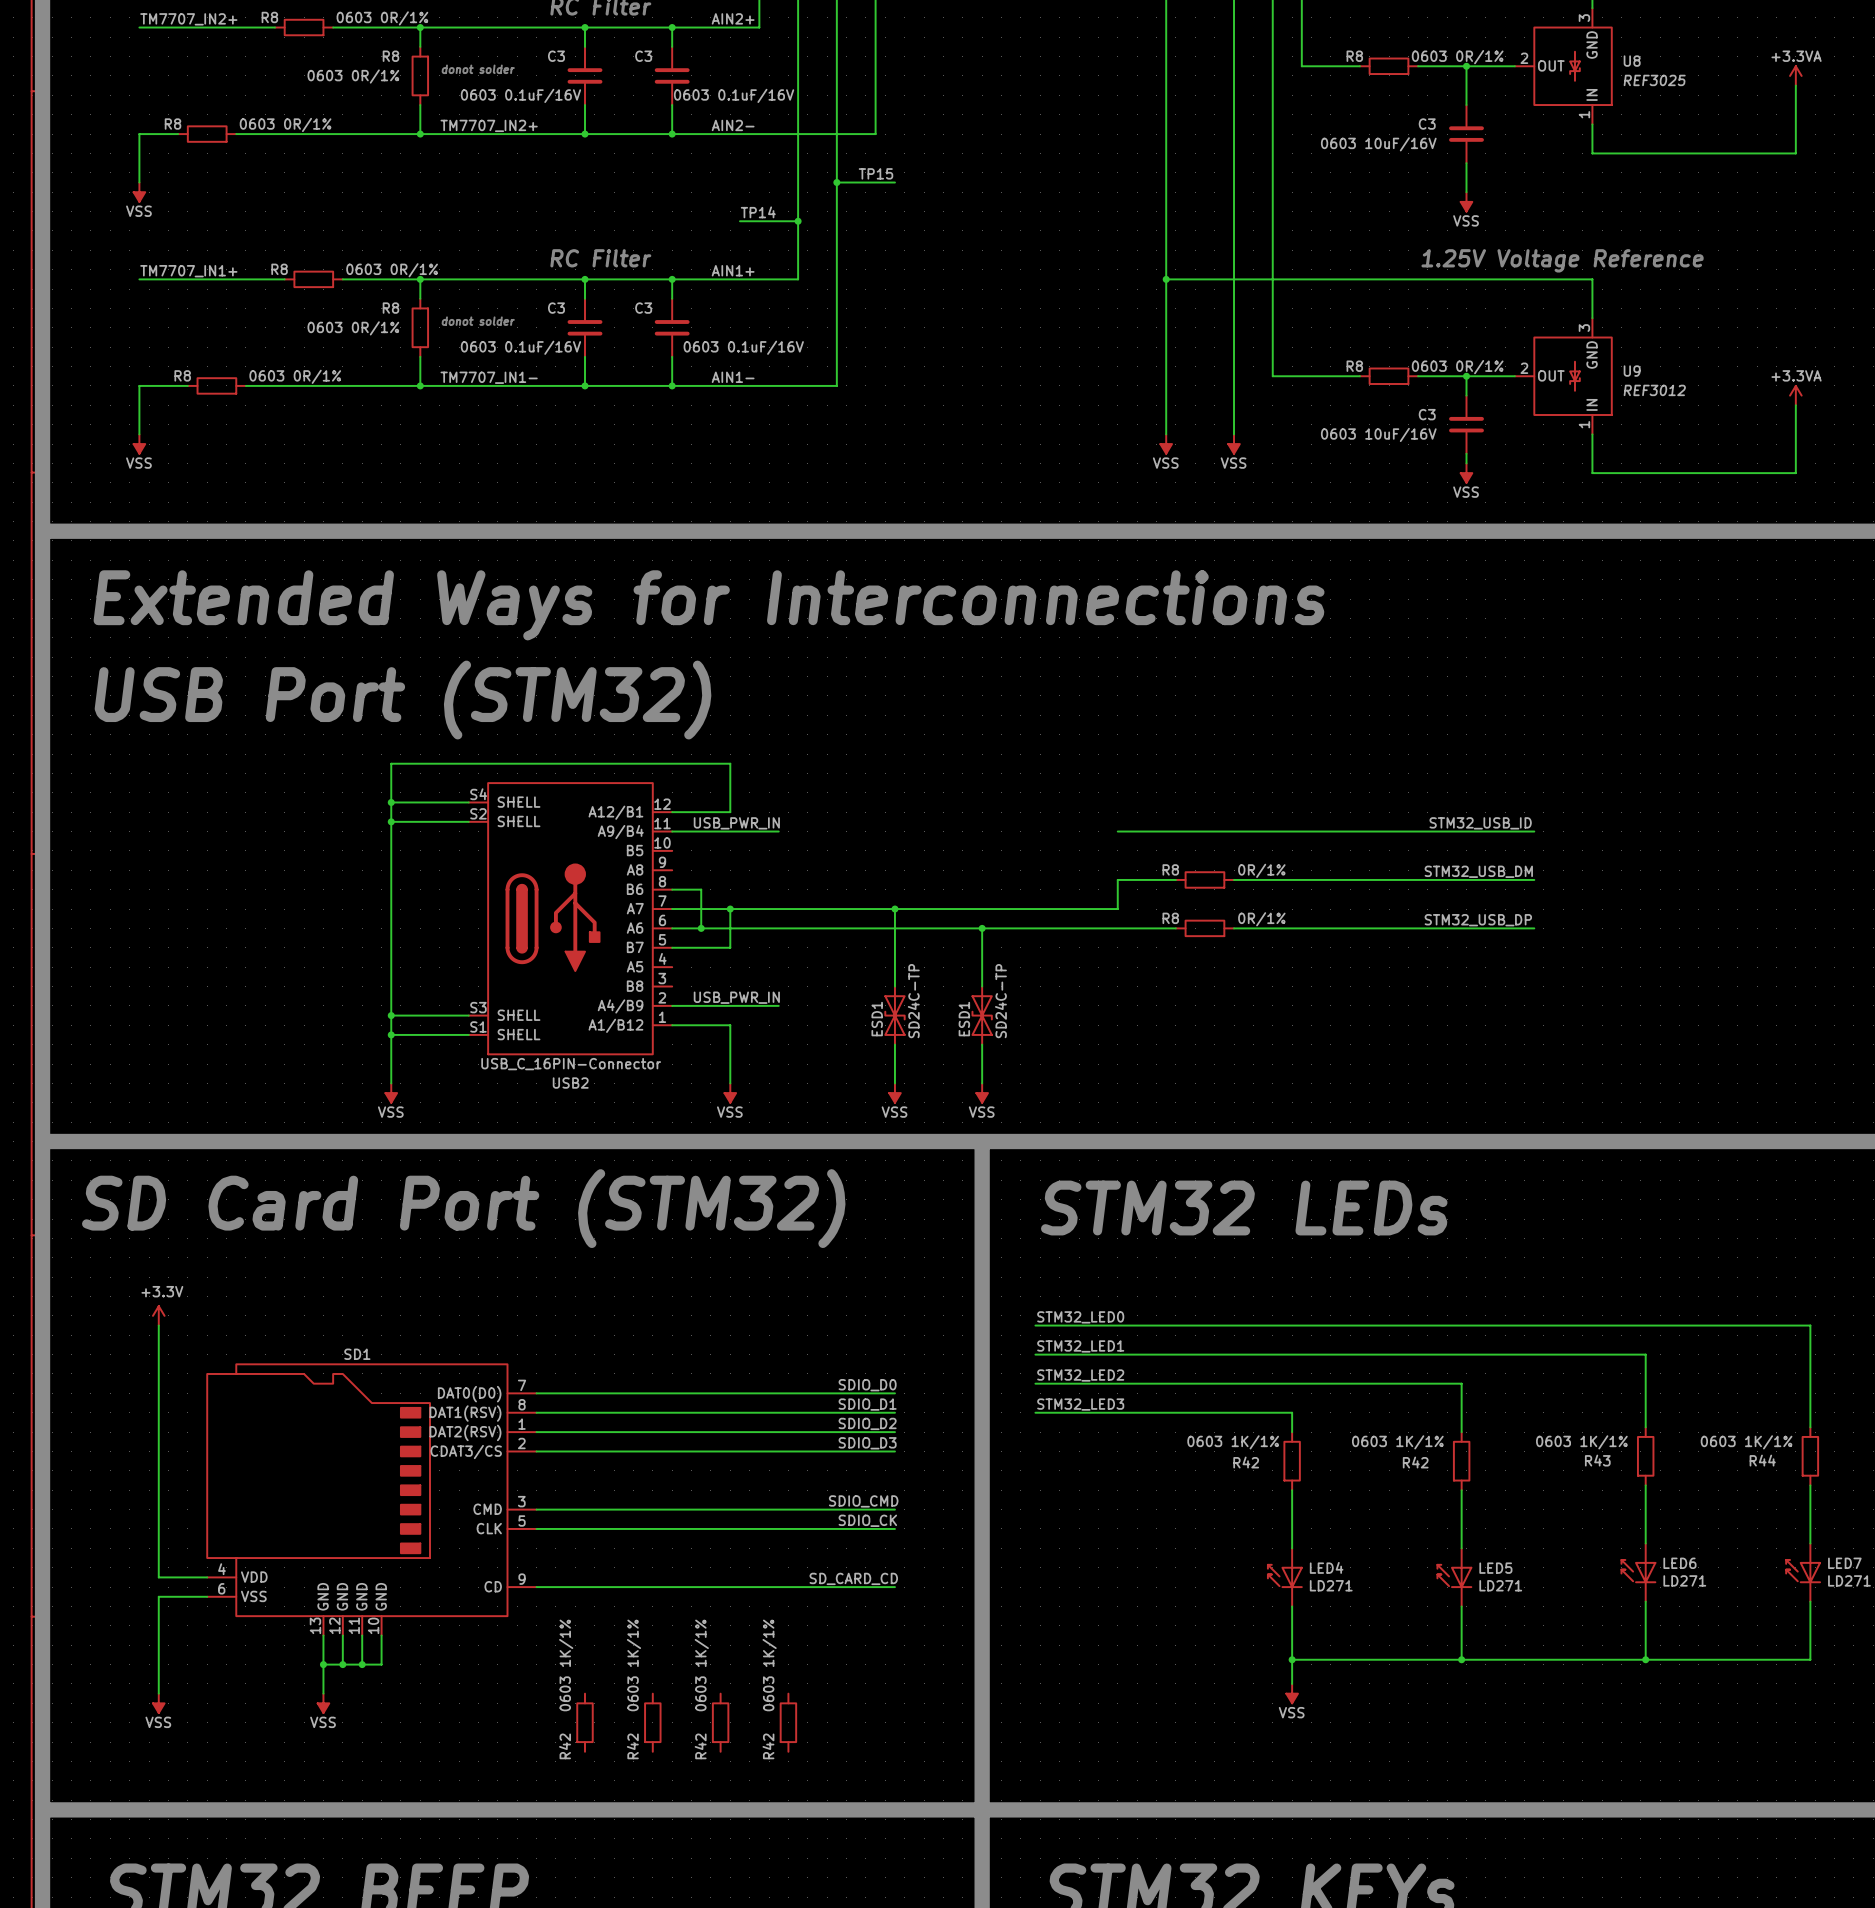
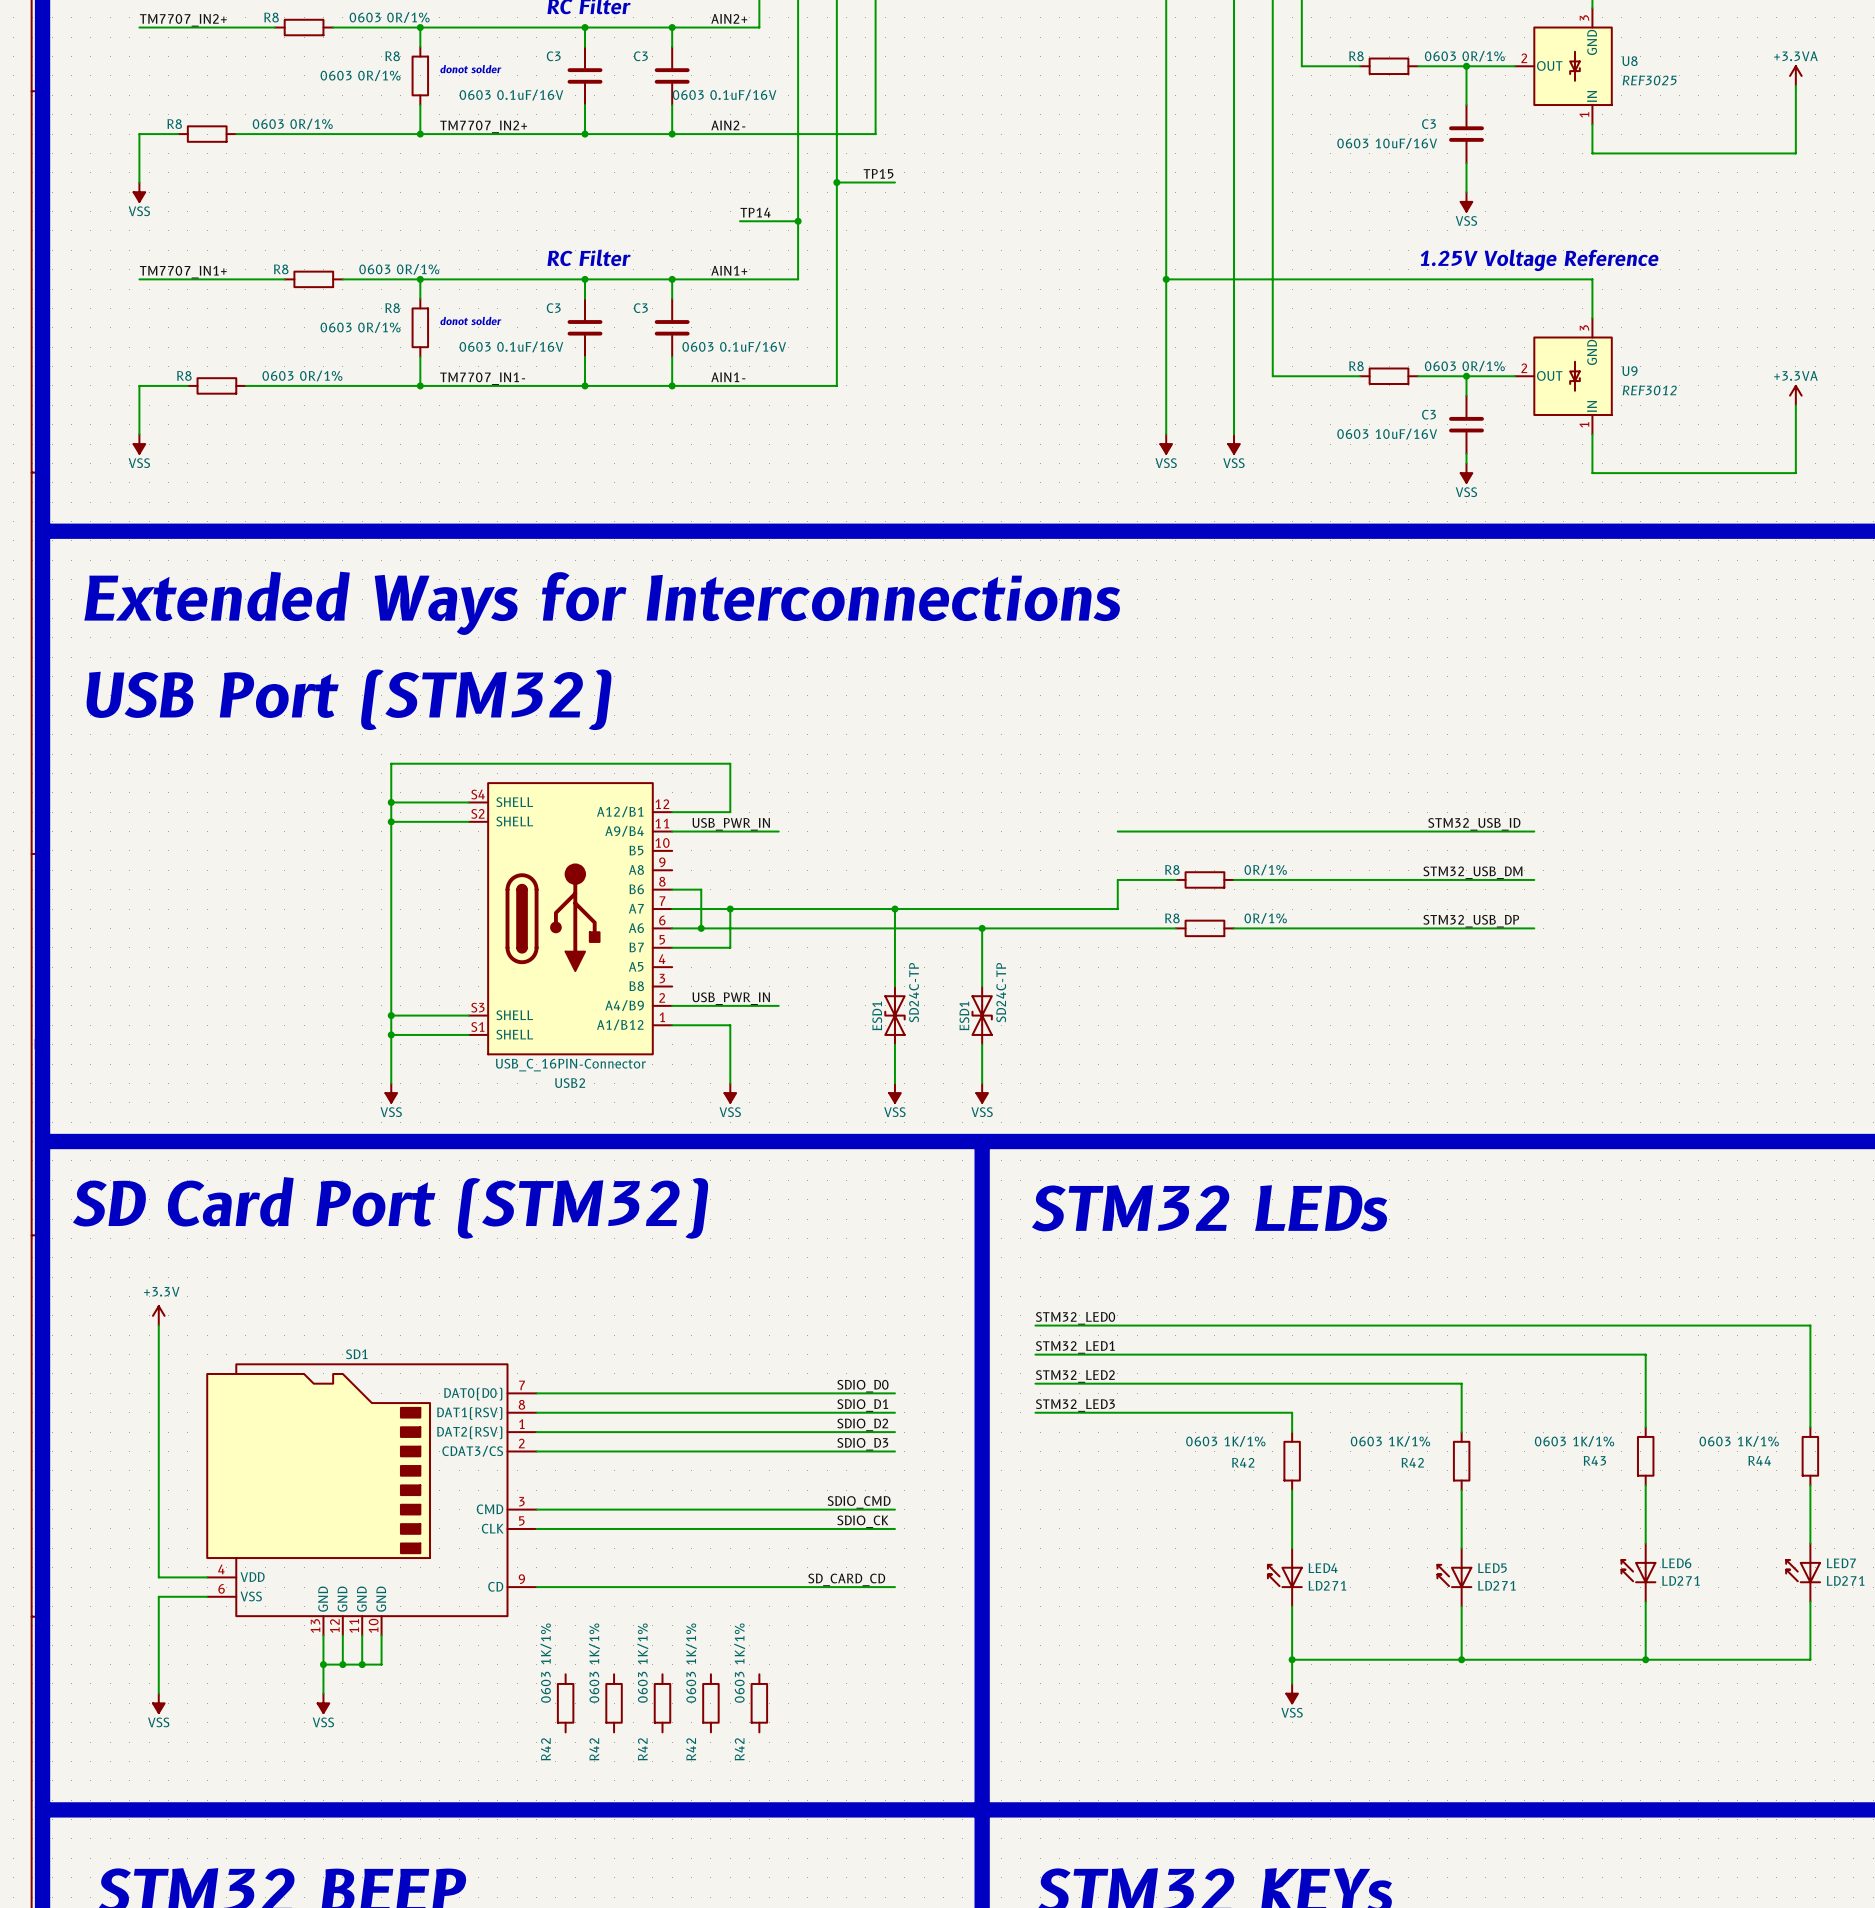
R42: none -> 0603 1K/1% (565, 1703)
R42: none -> 0603 1K/1% (614, 1703)
R42: none -> 0603 1K/1% (662, 1703)
R42: none -> 0603 1K/1% (710, 1703)
R42: none -> 0603 1K/1% (759, 1703)
R42: 0603 1K/1% (584, 1722) -> none
R42: 0603 1K/1% (652, 1722) -> none
R42: 0603 1K/1% (720, 1722) -> none
R42: 0603 1K/1% (788, 1722) -> none

